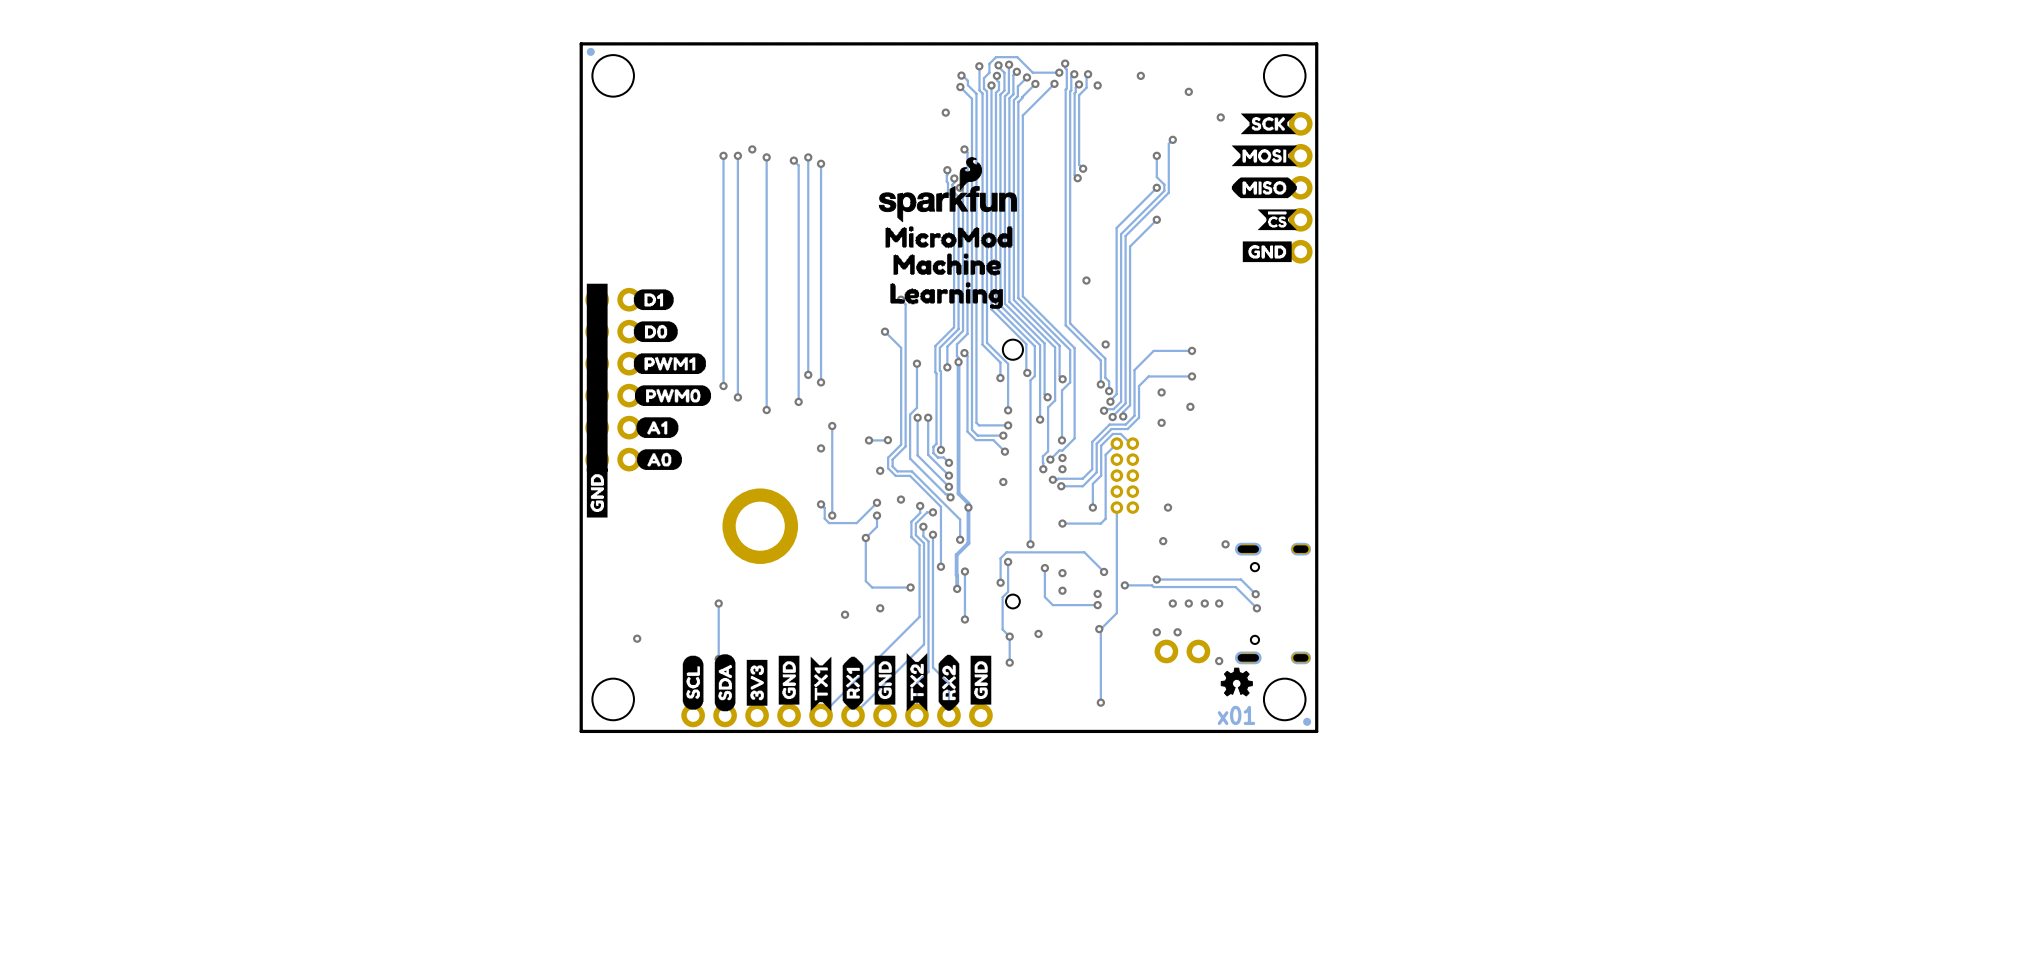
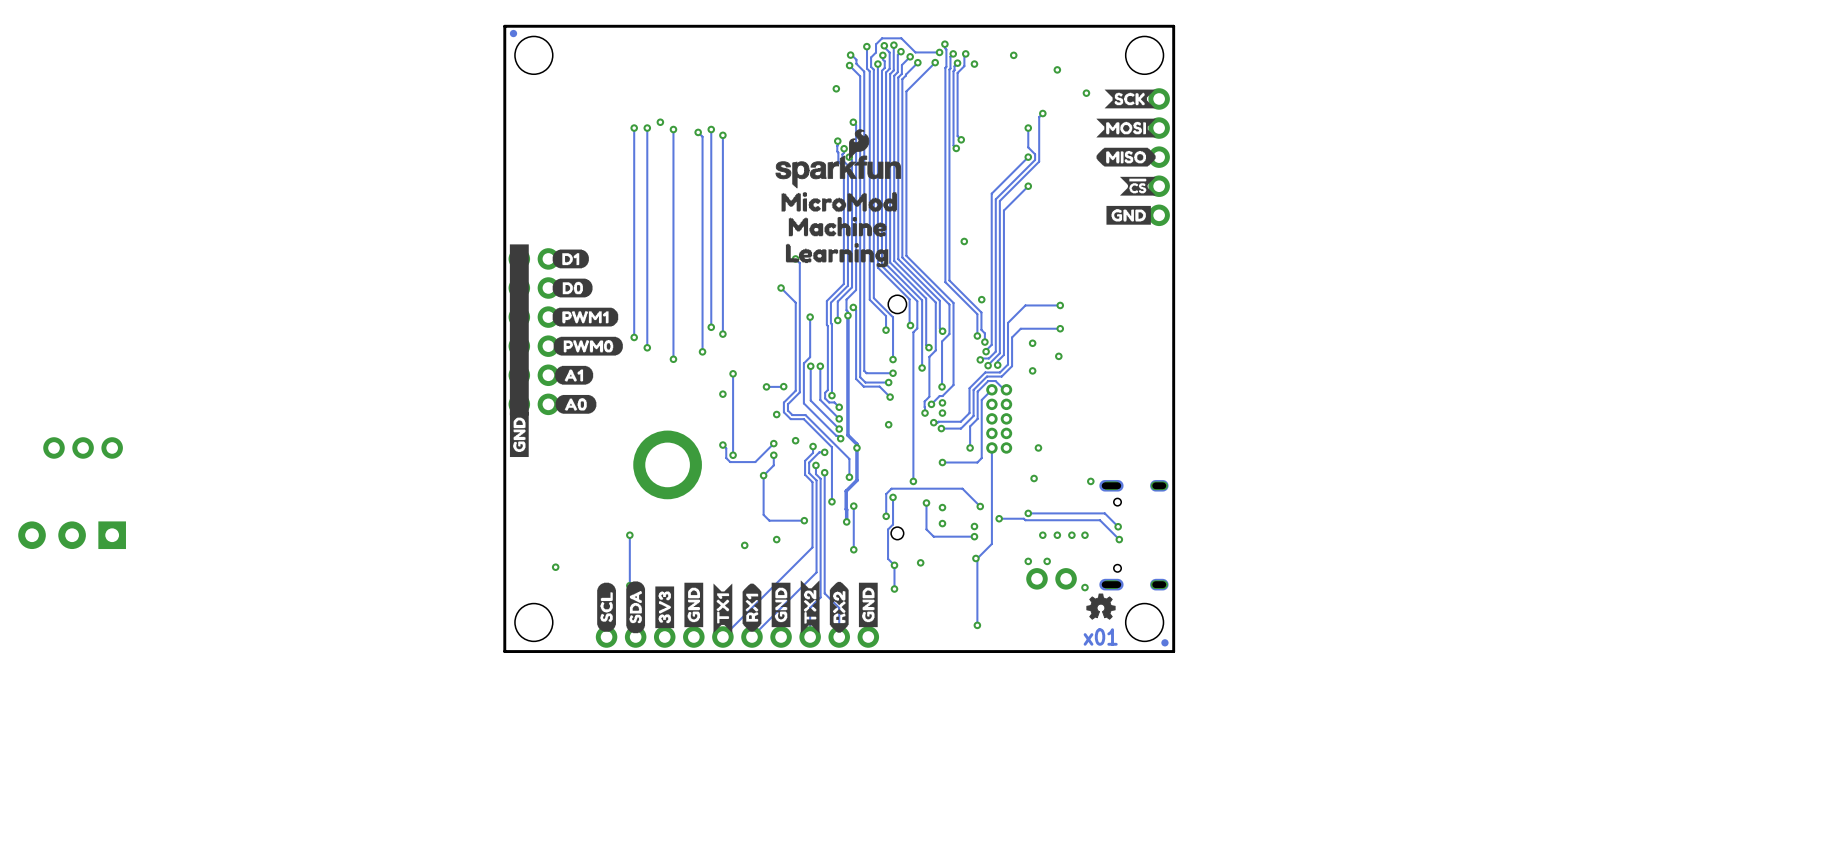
part: none -> (83, 447)
part: none -> (72, 535)

